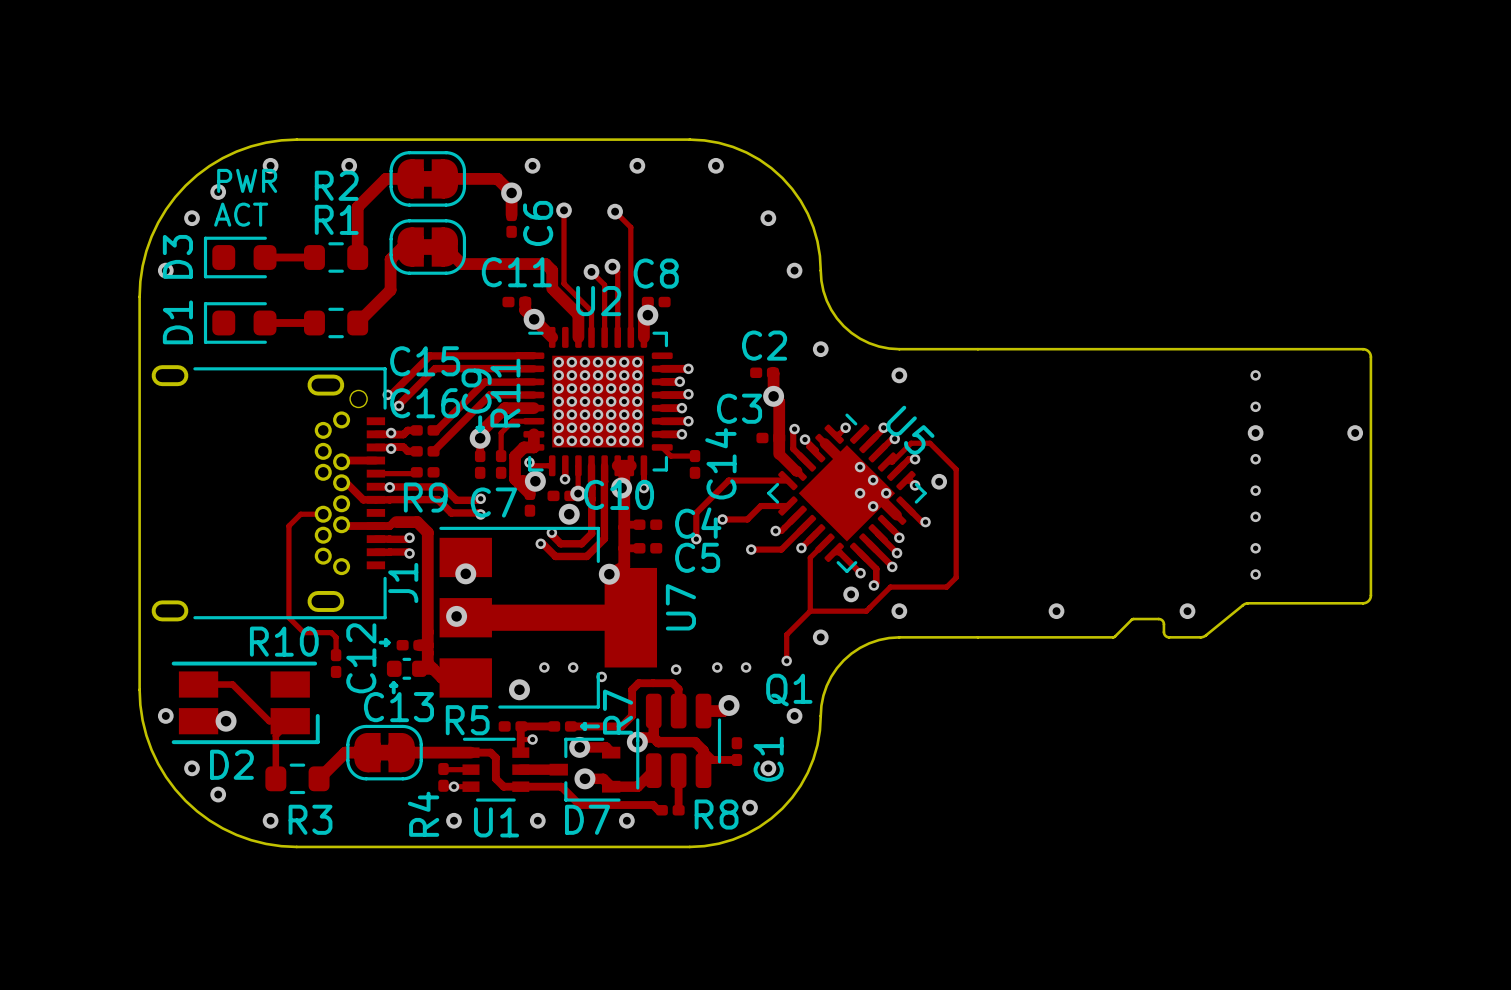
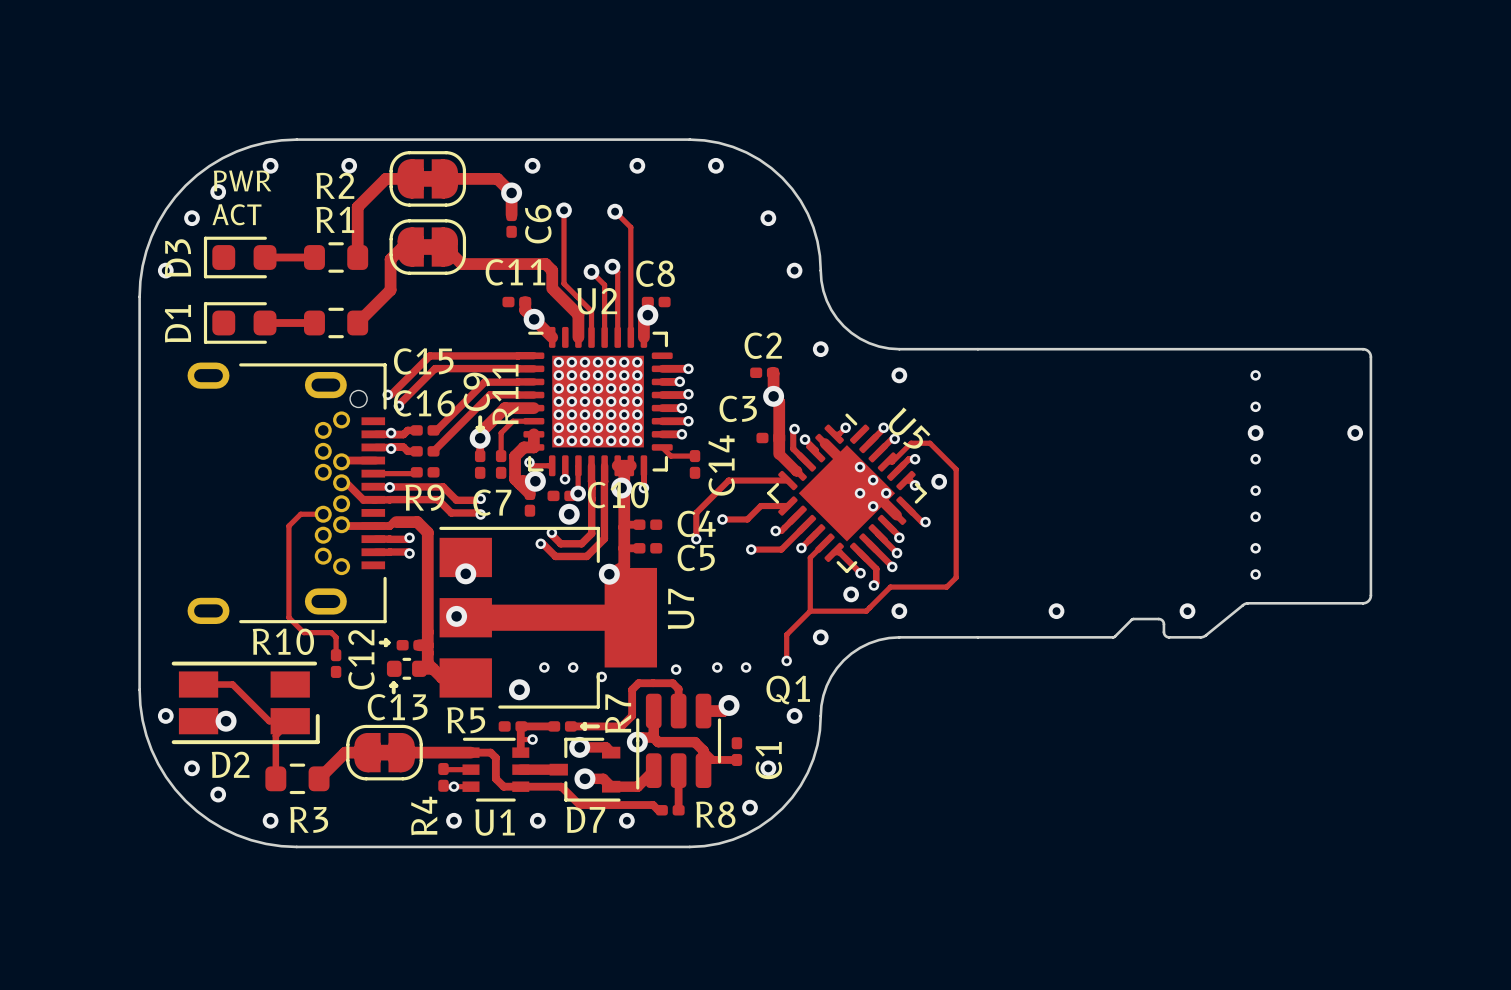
J1: (269, 493) -> none
part: none -> (287, 493)

